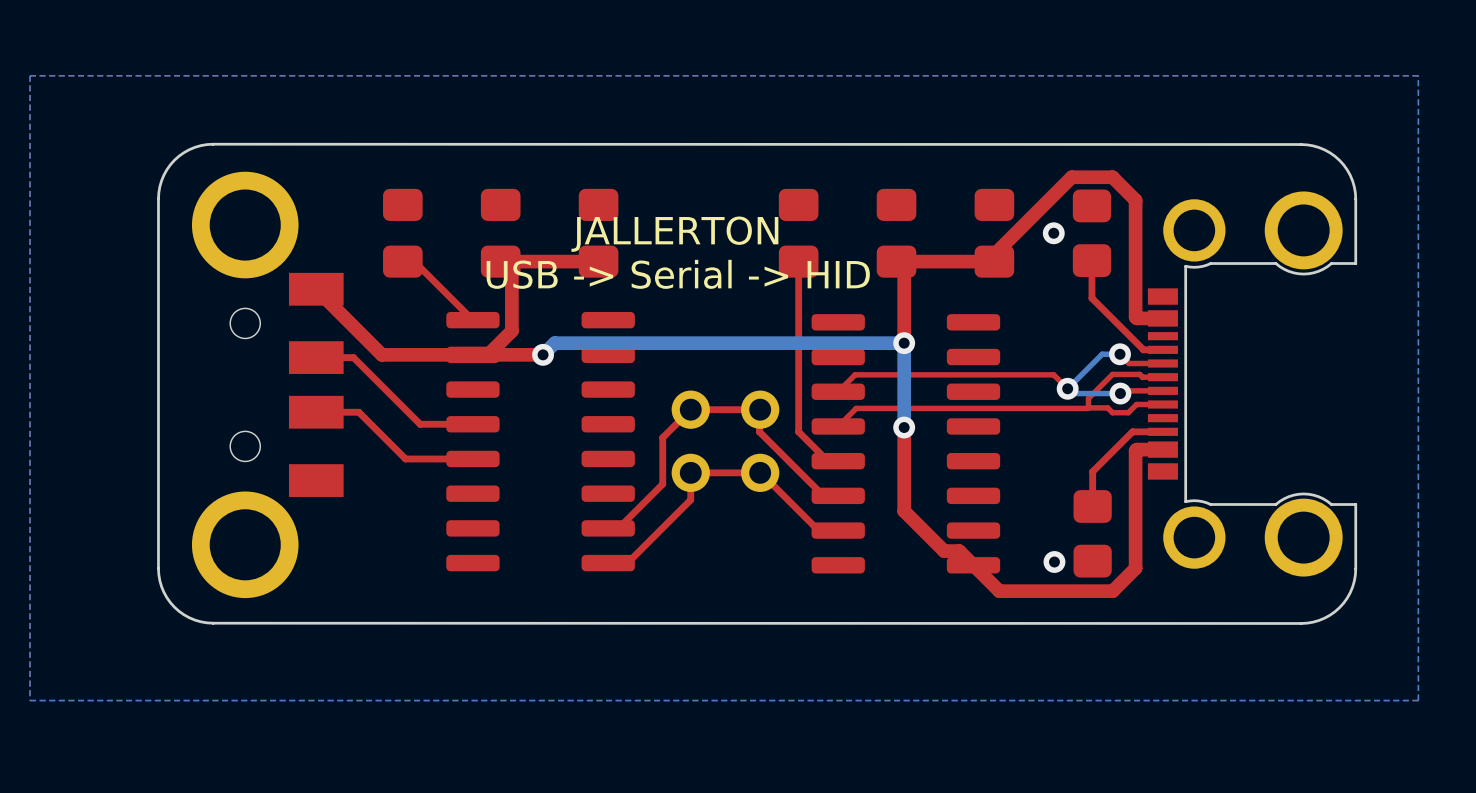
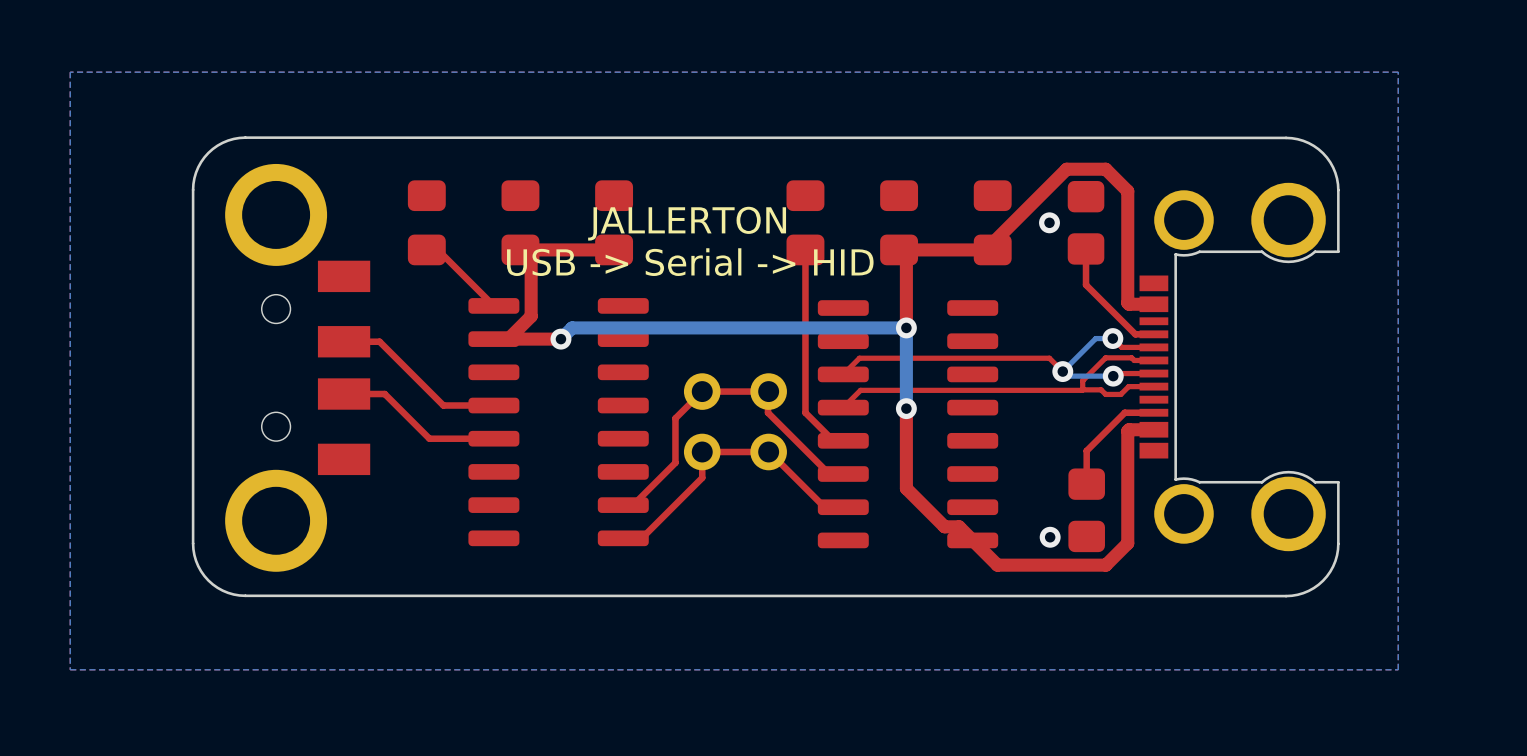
top track: (316, 289) (381, 354) (472, 354) -> none

